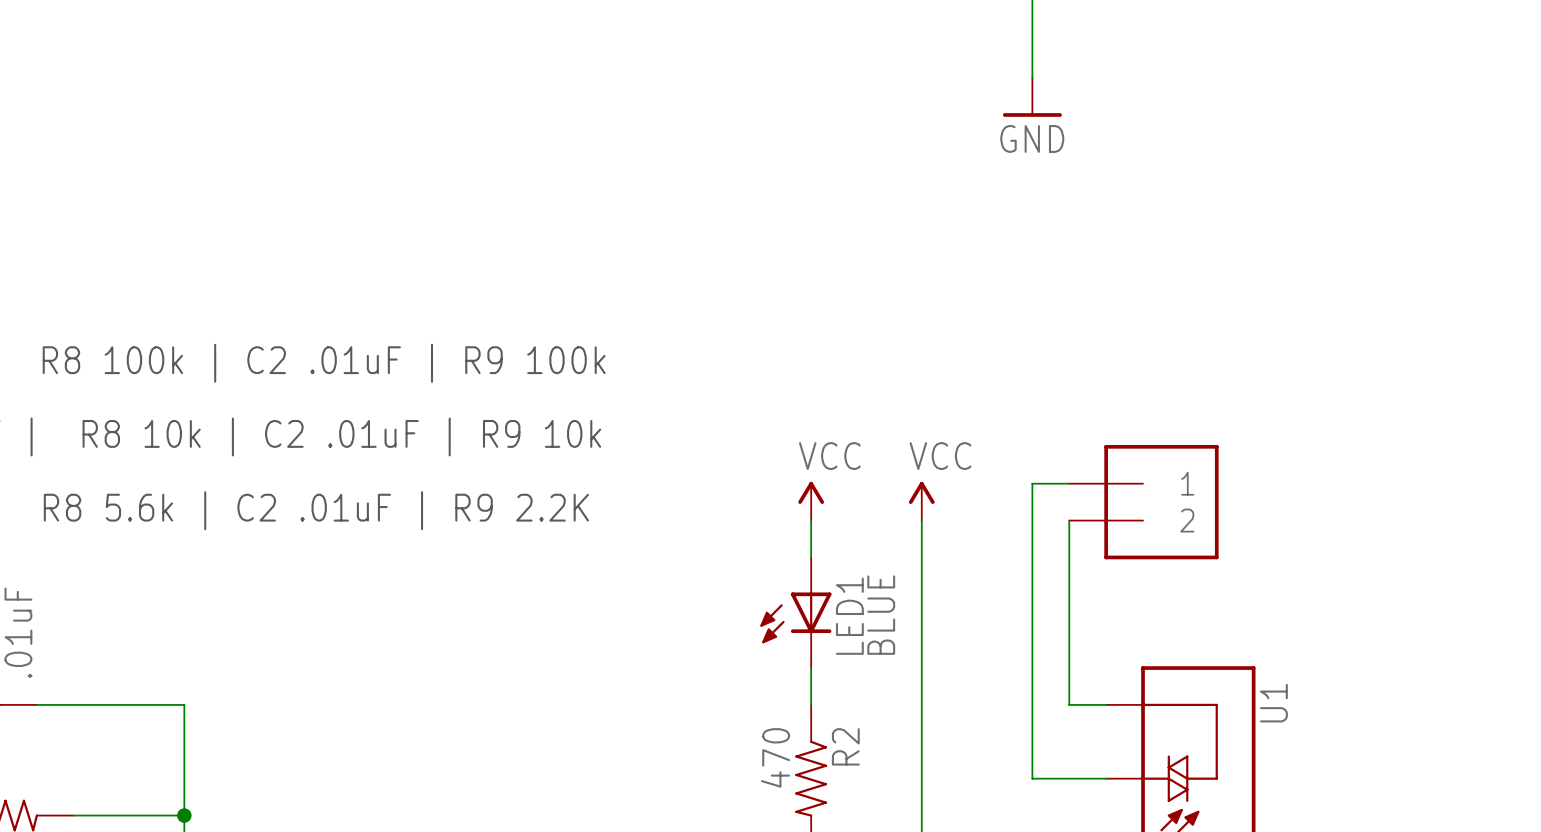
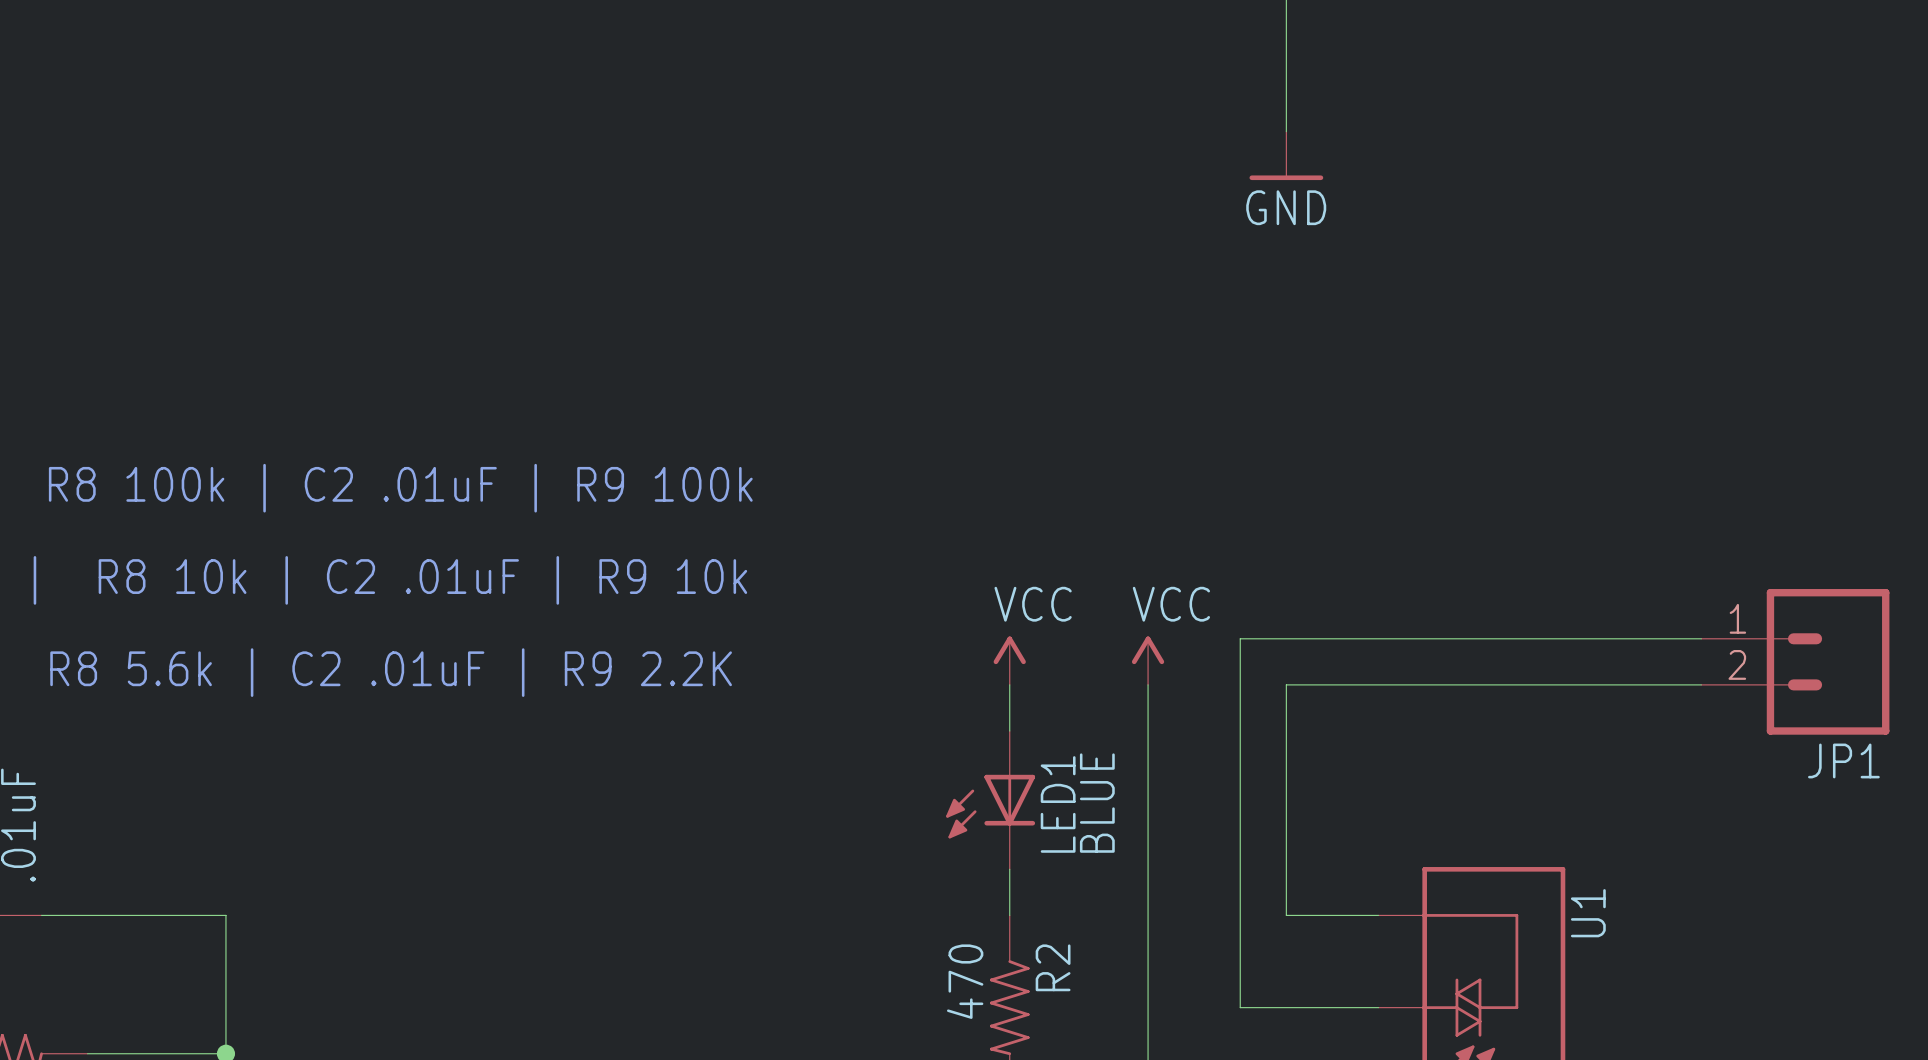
wire: (1032, 483) (1032, 520) -> (1286, 638) (1240, 638) (1240, 1007) (1286, 1007)
wire: none -> (1332, 638) (1701, 638)
part: (1143, 502) -> none
JP1: none -> (1795, 661)
wire: none -> (1286, 684) (1701, 684)
wire: (1069, 520) (1069, 704) -> none
wire: (1032, 704) (1032, 778) -> (1286, 915) (1332, 915)

